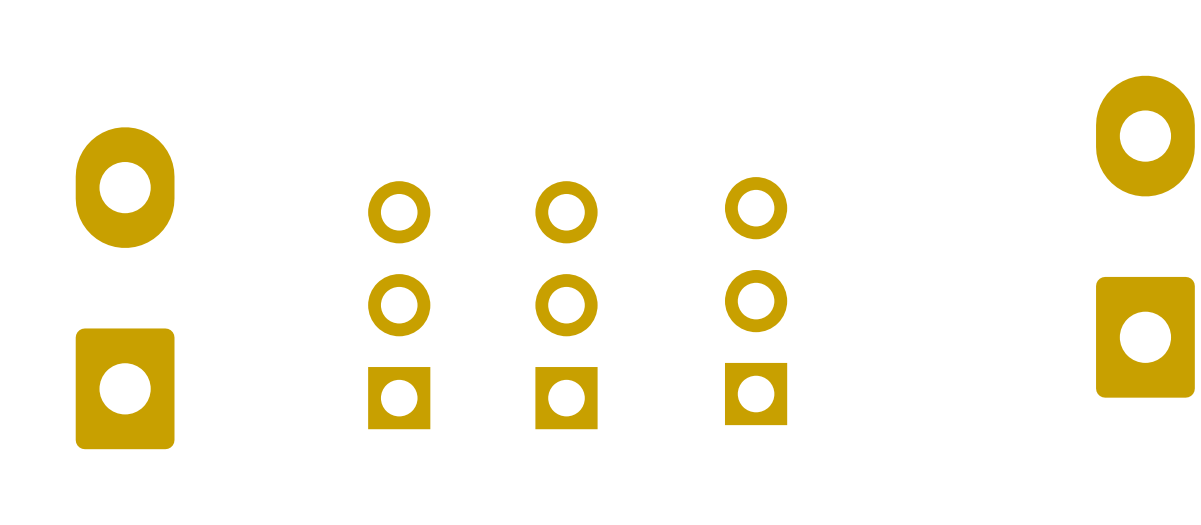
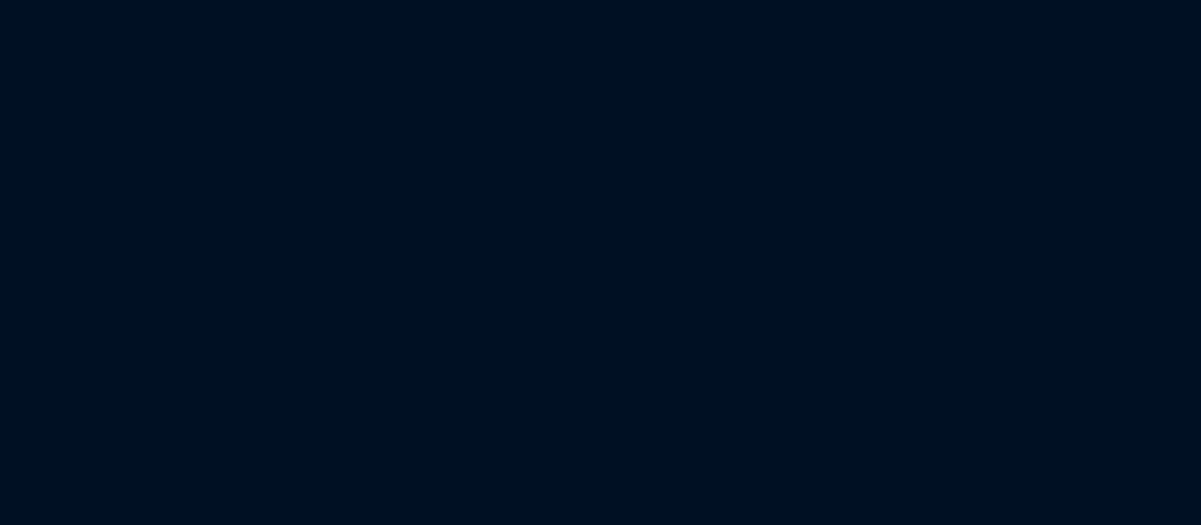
part: (1145, 236) -> none
part: (125, 288) -> none
part: (756, 301) -> none
part: (399, 305) -> none
part: (566, 305) -> none

